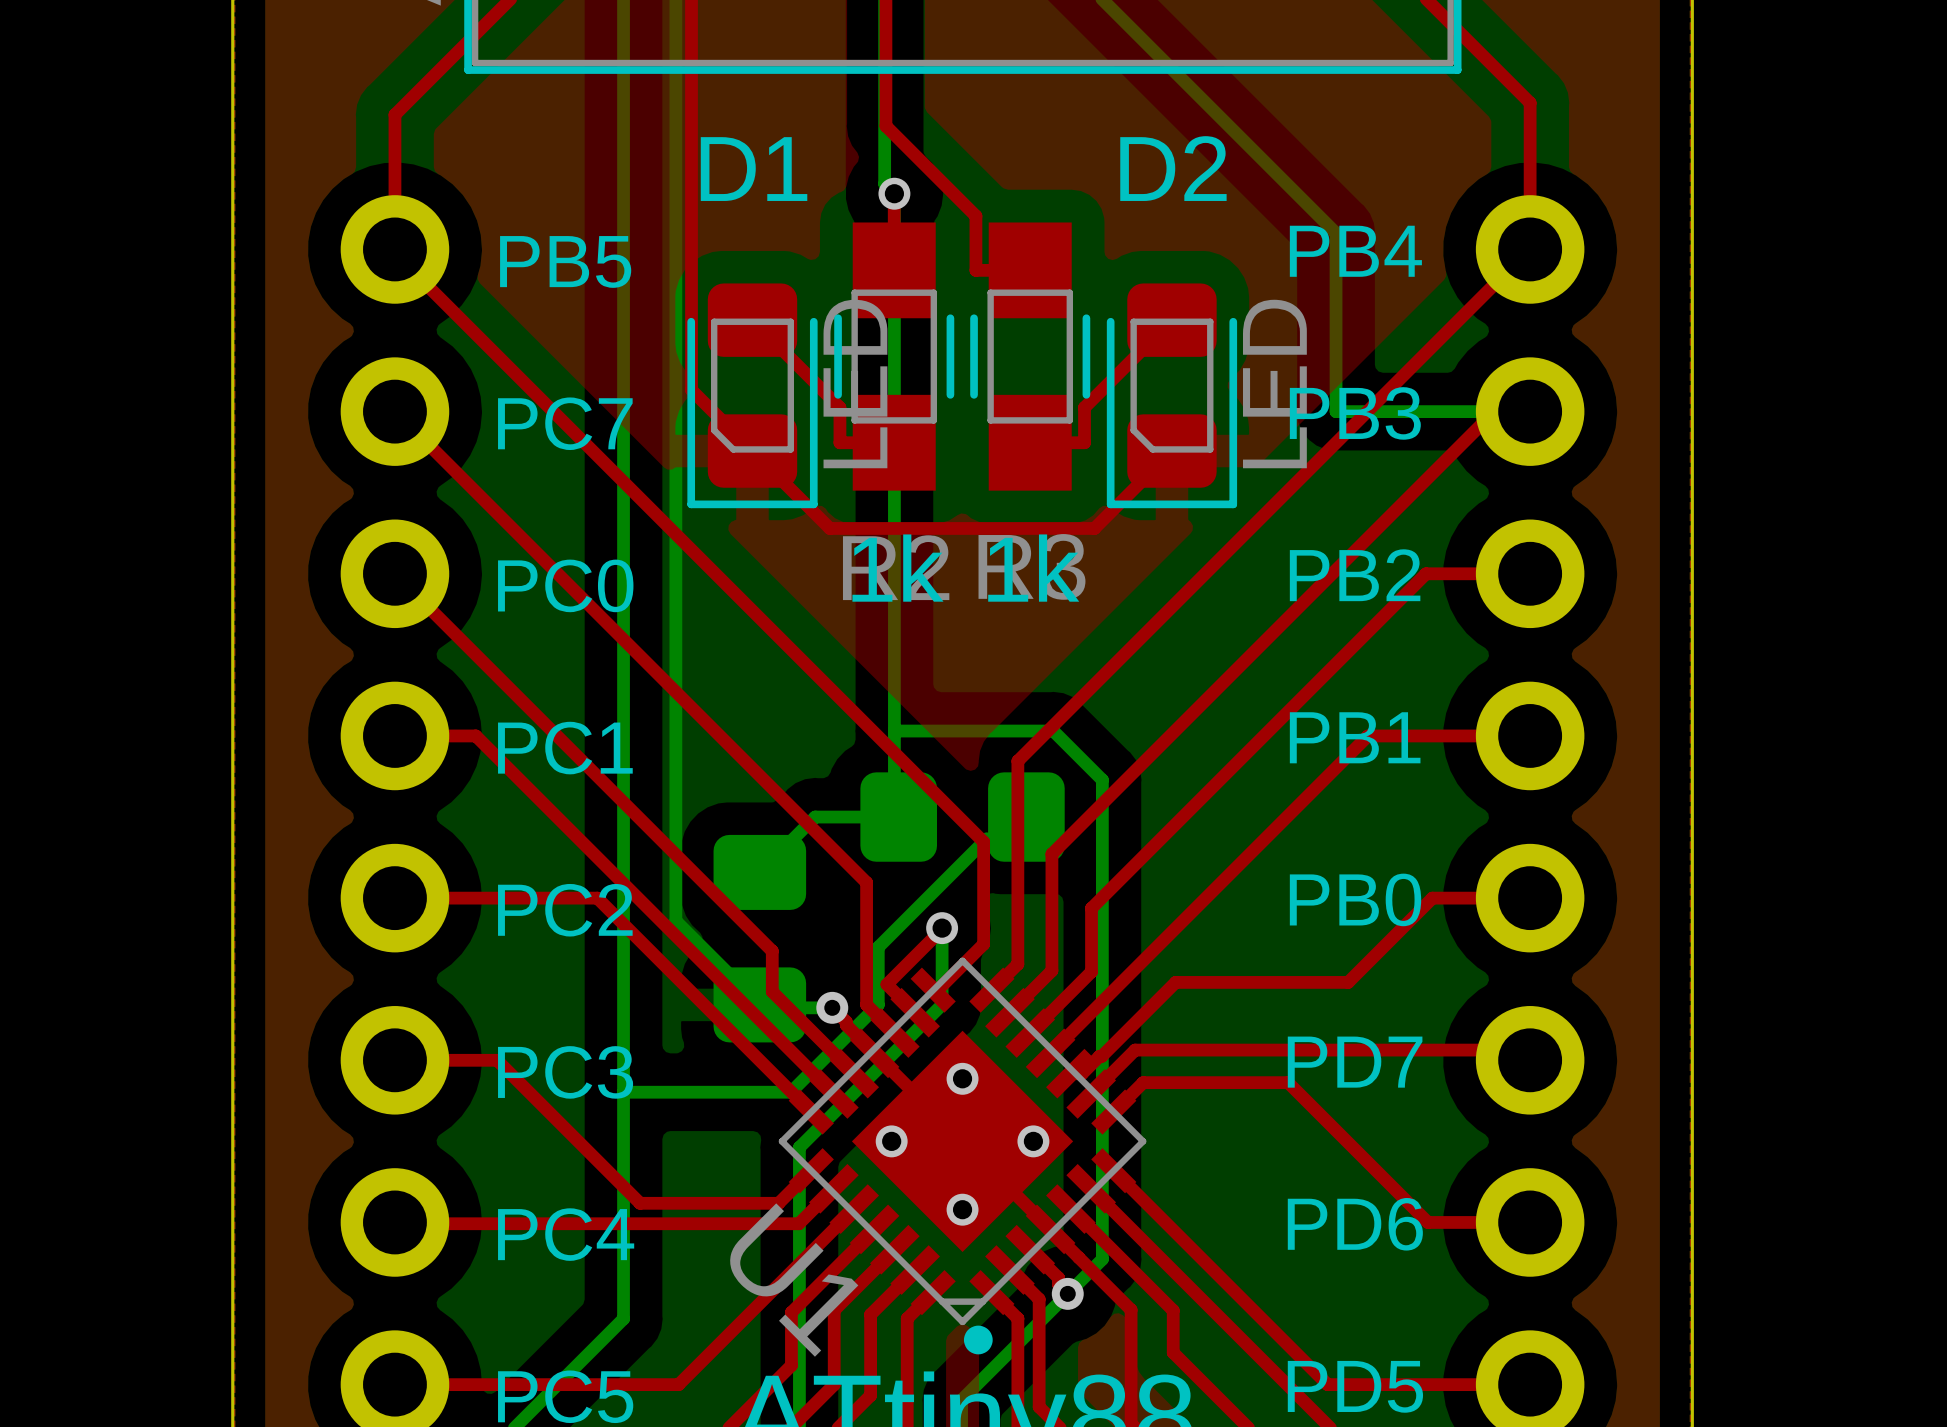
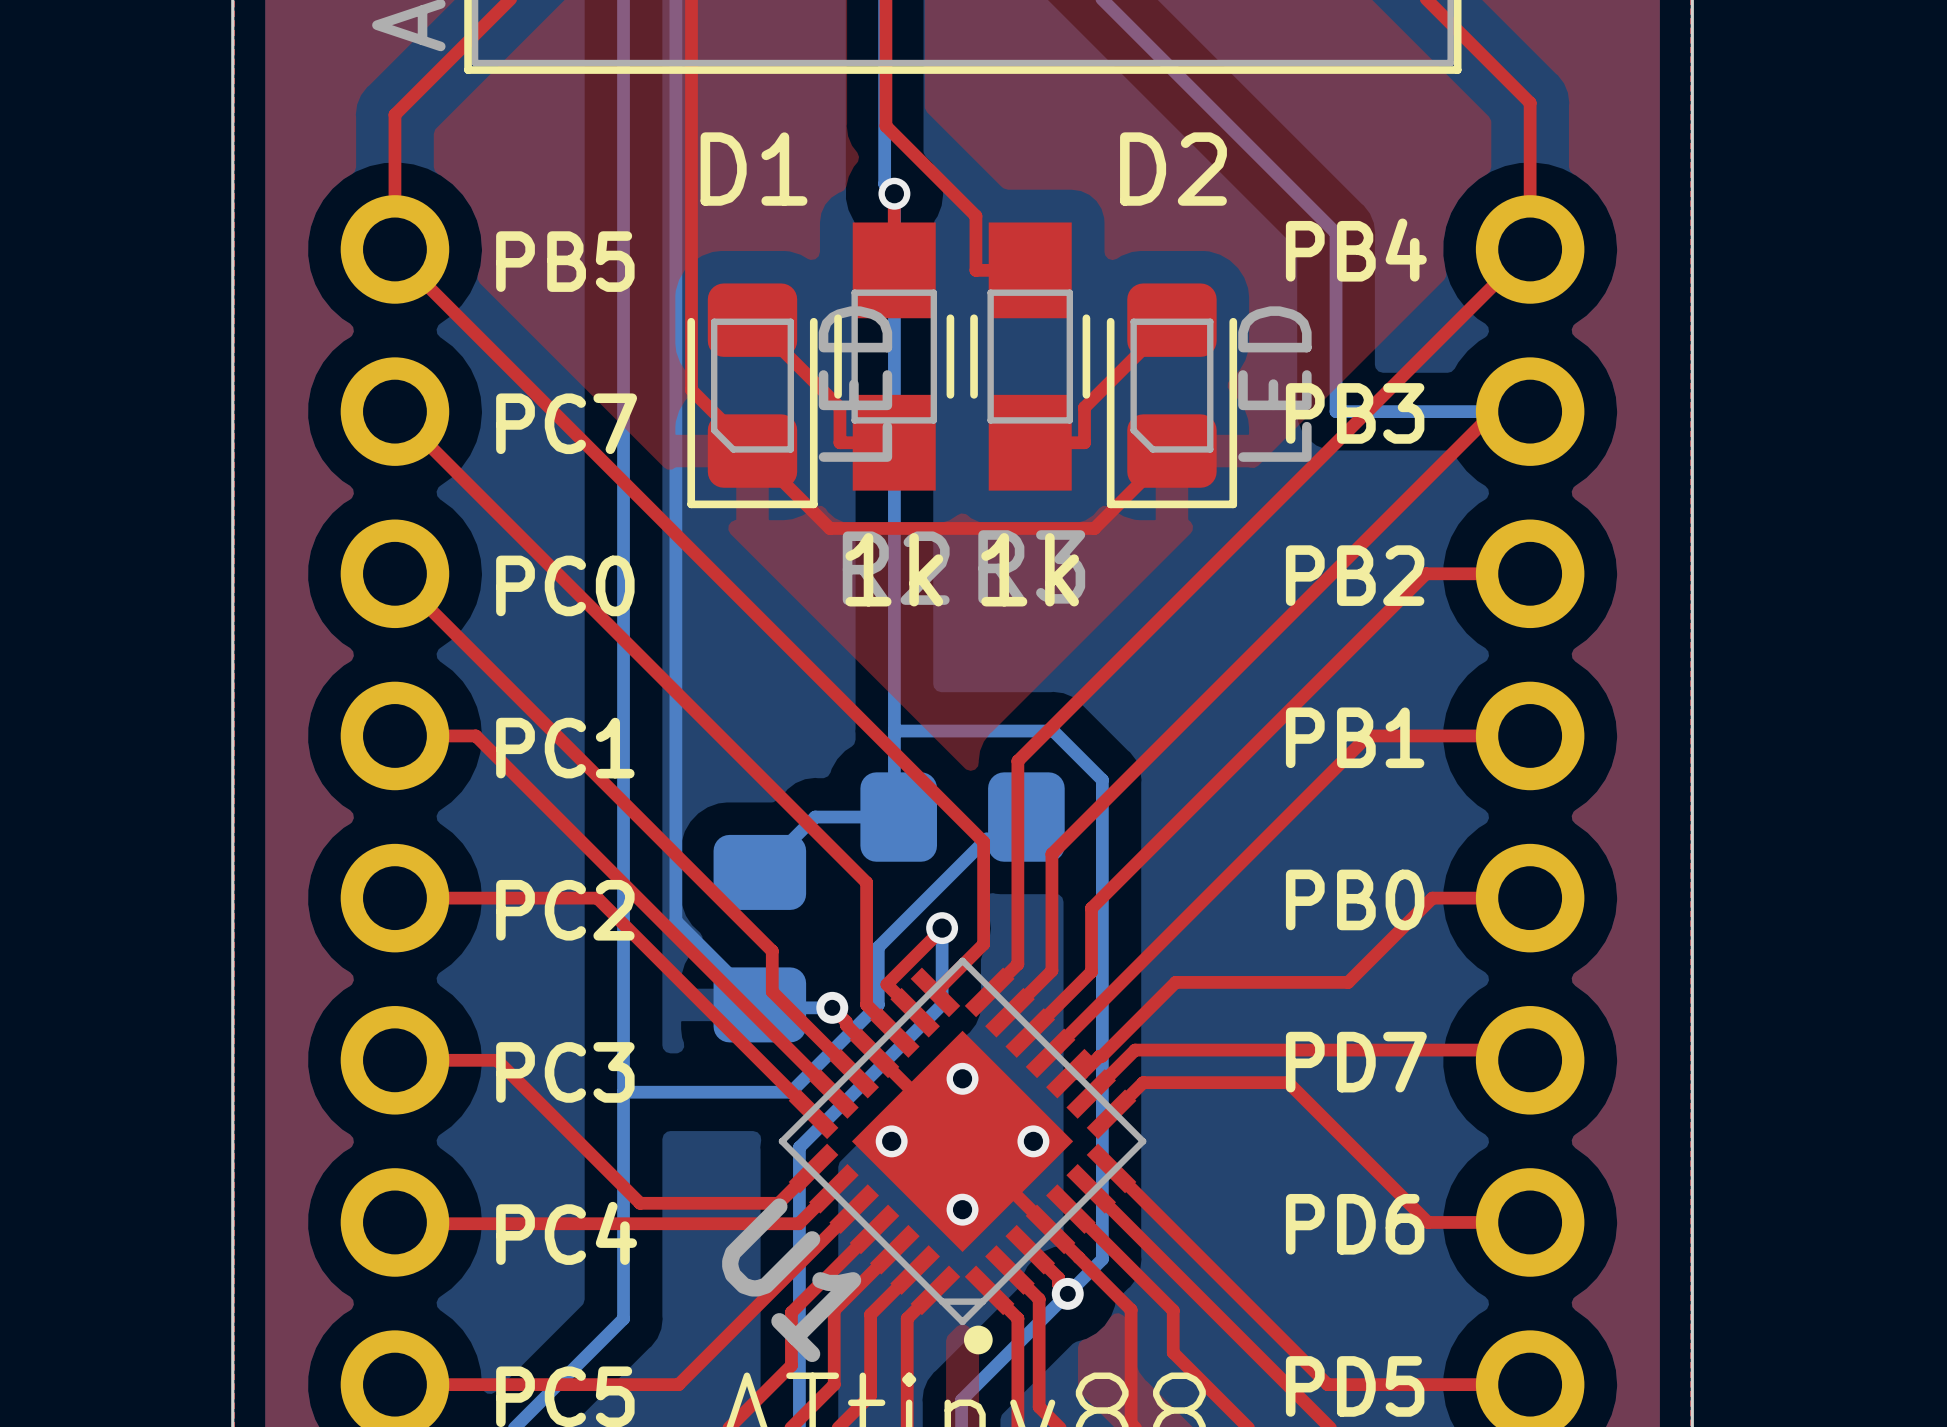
U1 footprint: [778, 957, 1147, 1355] -> [778, 957, 1147, 1355]

